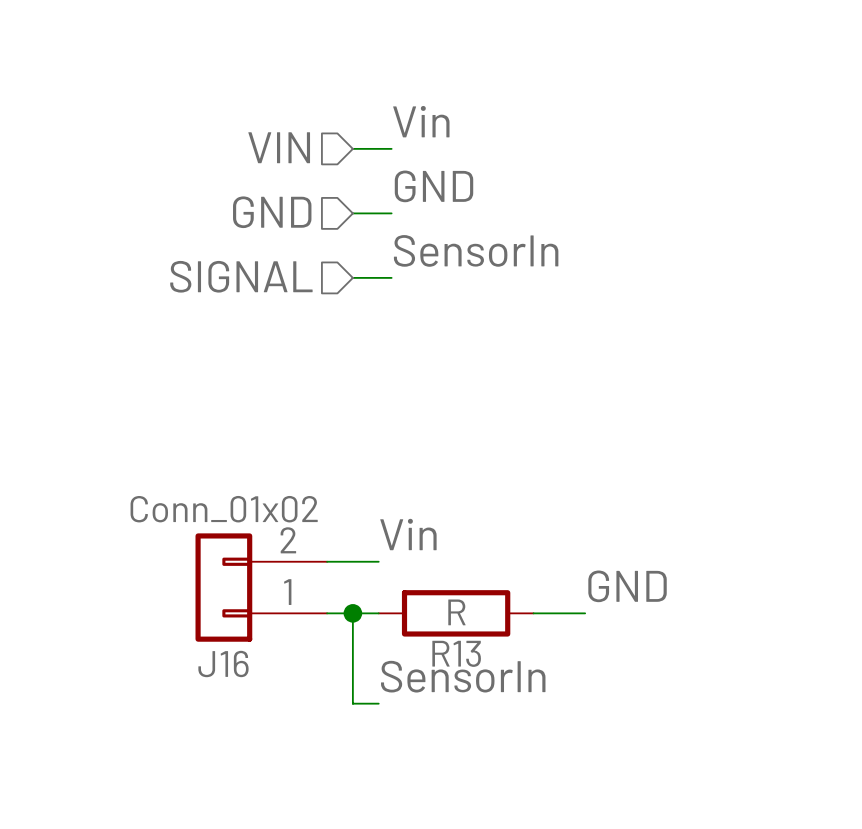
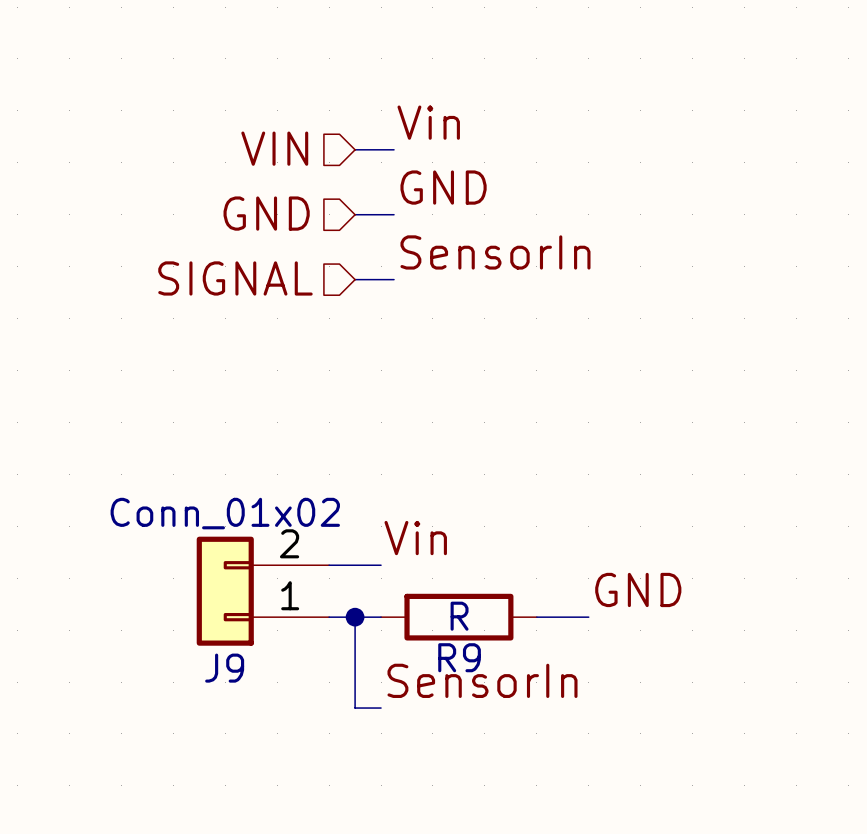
R13 name: R13 (456, 653) -> R9 (459, 657)
J16 name: J16 (223, 664) -> J9 (224, 668)

